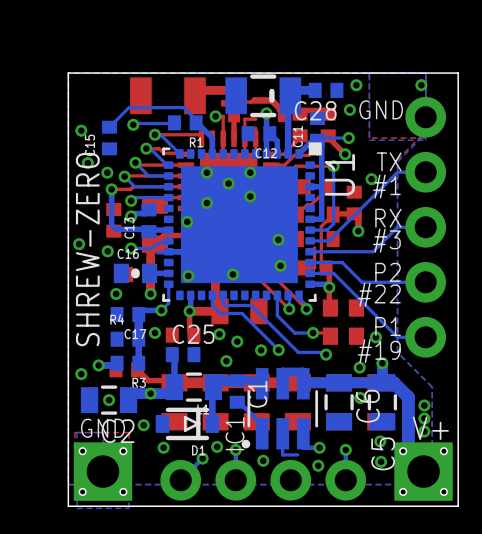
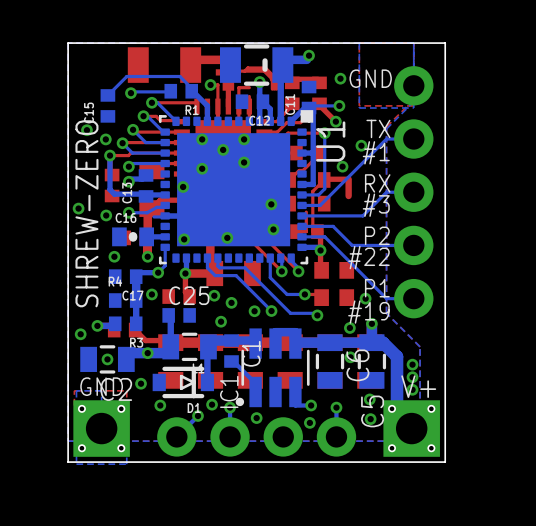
via position: (356, 85) -> (309, 55)
via: (421, 85) -> none
C28: (326, 90) -> none
via: (81, 130) -> none
part: (354, 203) -> none
via position: (358, 231) -> (342, 166)
bottom track: (282, 446) (282, 454) (297, 454) -> none

